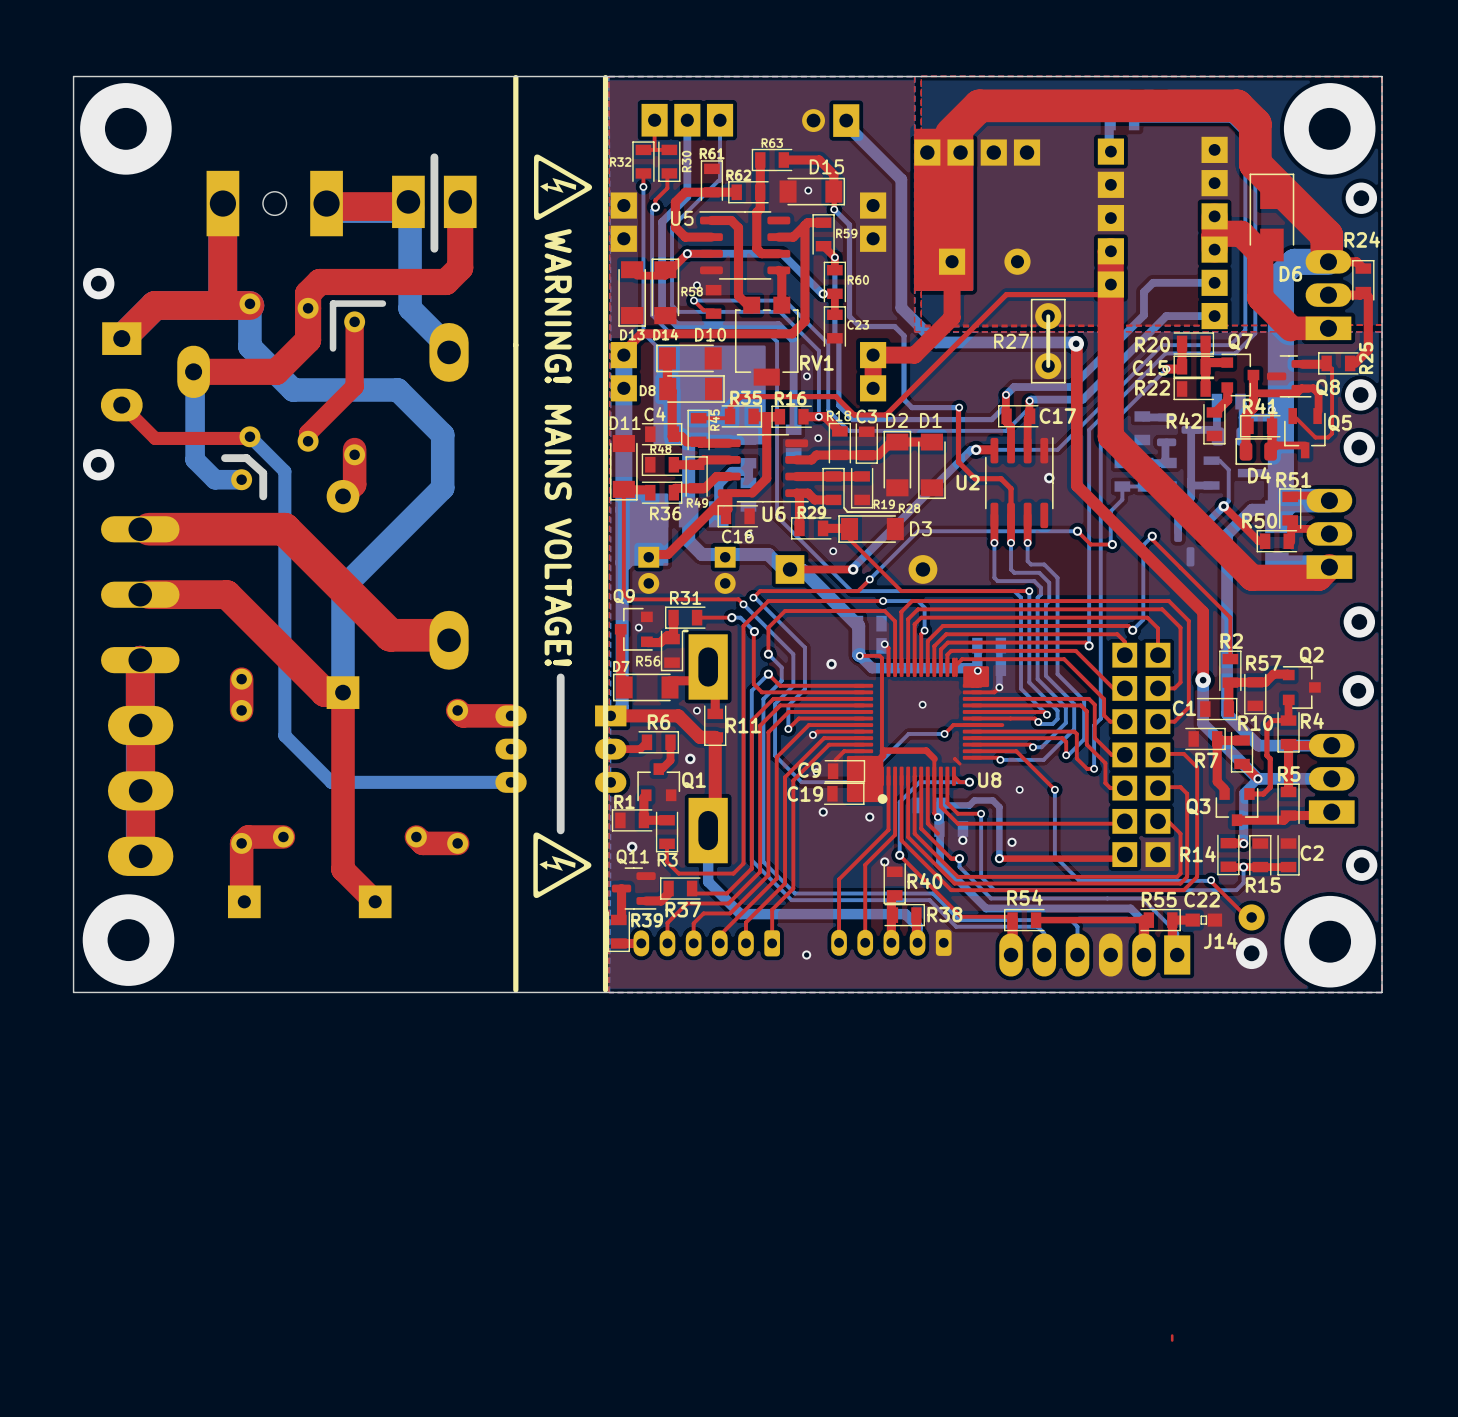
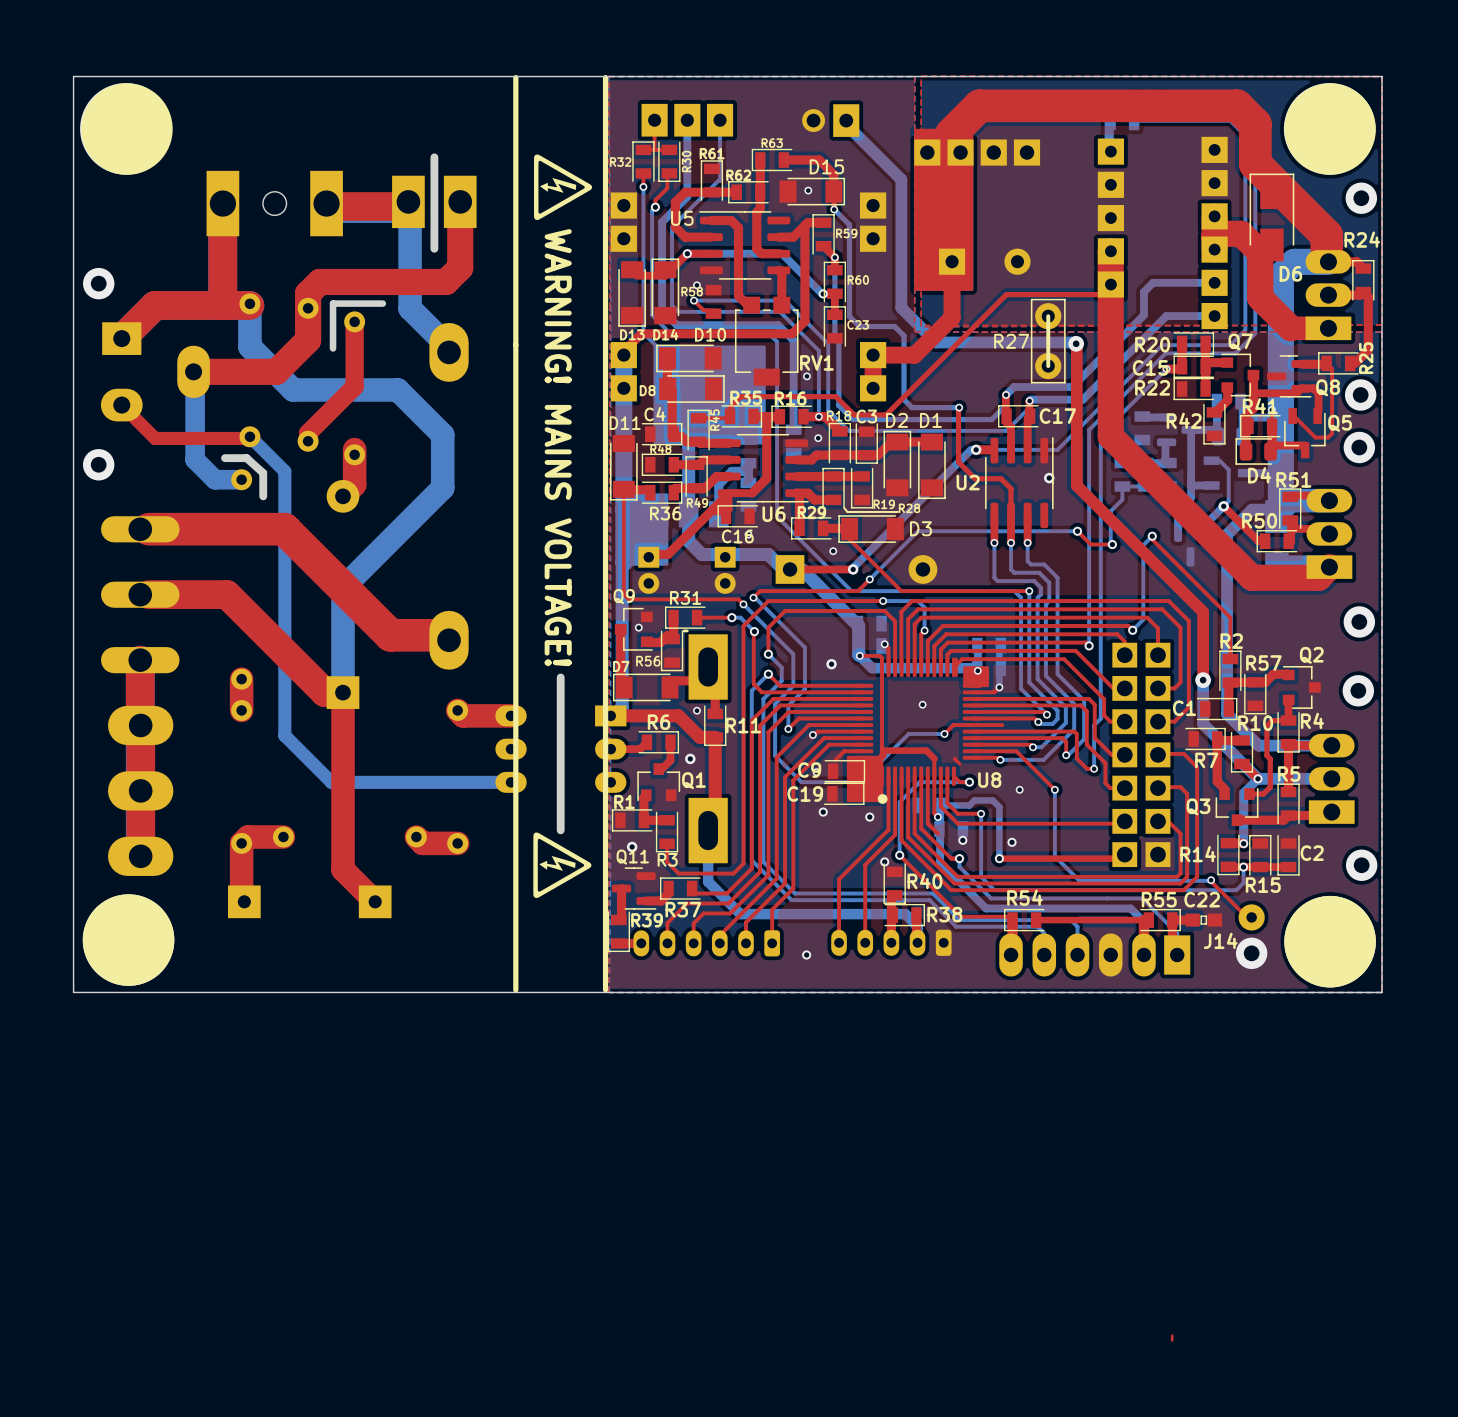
drawing: none -> [81, 83, 173, 175]
drawing: none -> [1284, 83, 1376, 175]
drawing: none -> [82, 894, 175, 986]
drawing: none -> [1284, 895, 1376, 988]

